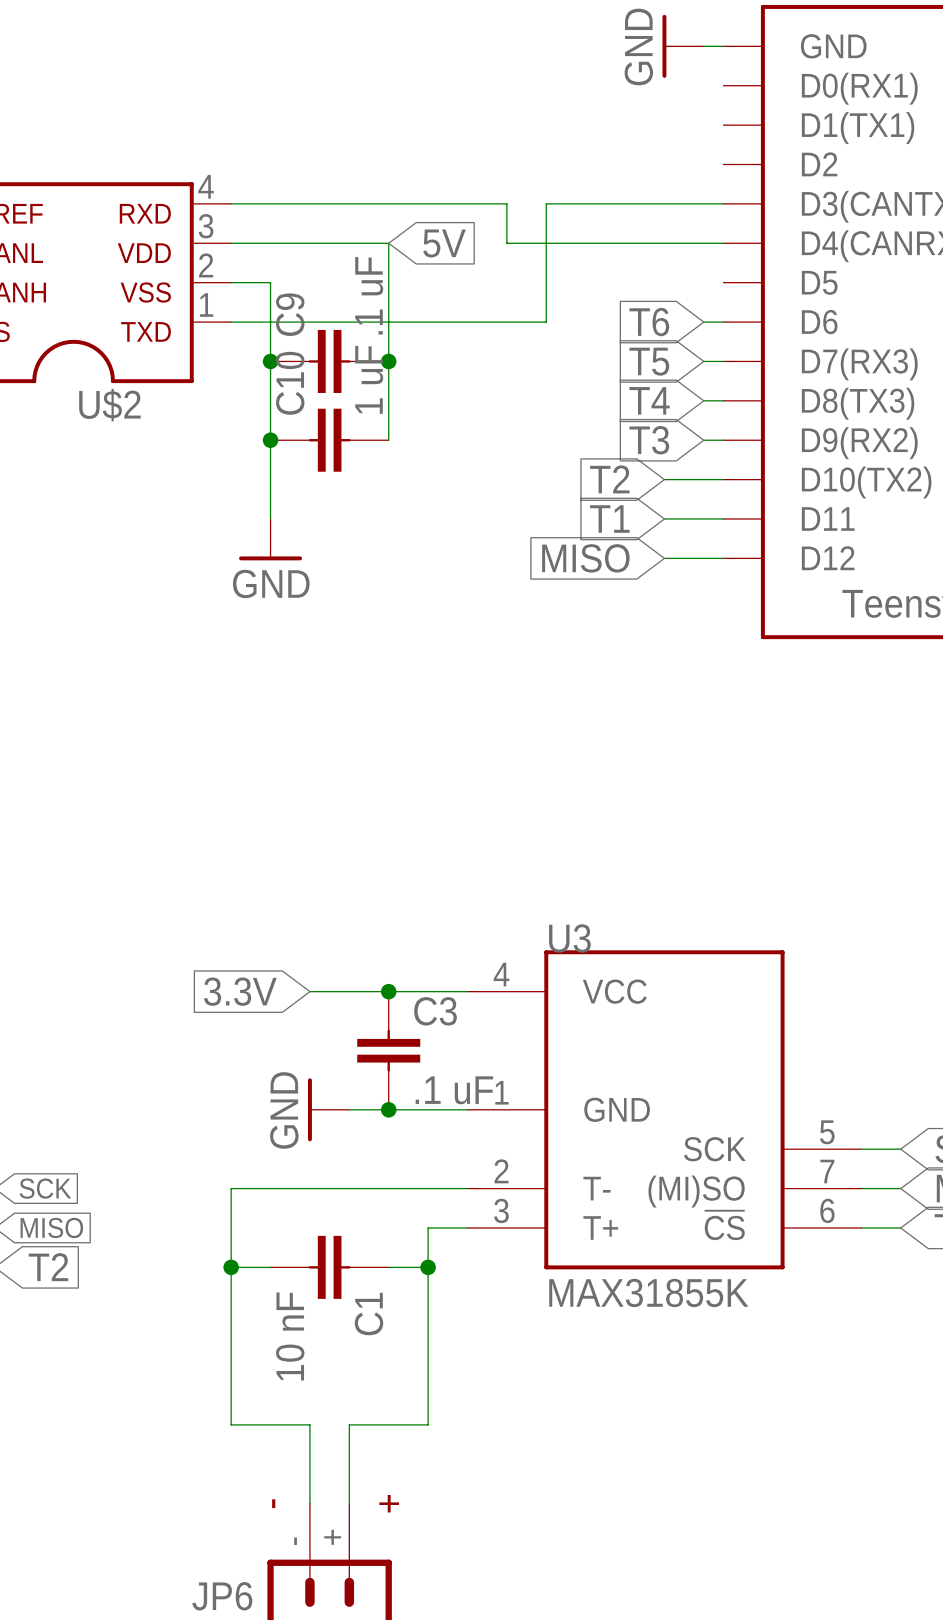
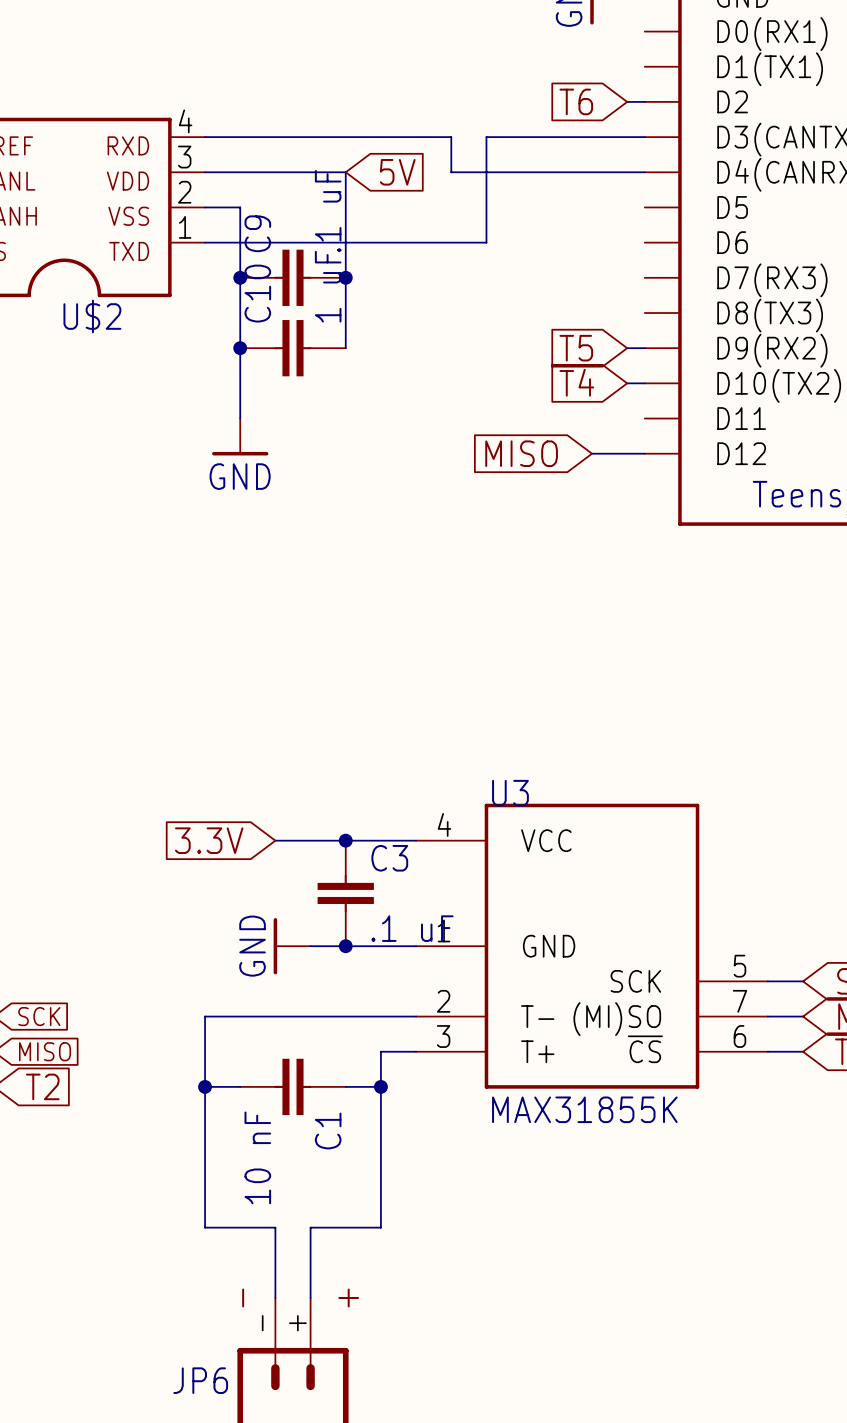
global label position: T6 (649, 322) -> T6 (576, 101)
wire: (703, 322) (723, 322) -> (627, 101) (644, 101)
global label: T5 (649, 361) -> none
wire: (703, 361) (723, 361) -> none
global label position: T4 (649, 400) -> T4 (576, 382)
wire: (703, 400) (723, 400) -> none
global label: T3 (649, 440) -> T5 (576, 348)
global label: T2 (609, 479) -> none
wire: (664, 479) (703, 479) -> none
global label: T1 (609, 519) -> none
wire: (664, 519) (723, 519) -> none

